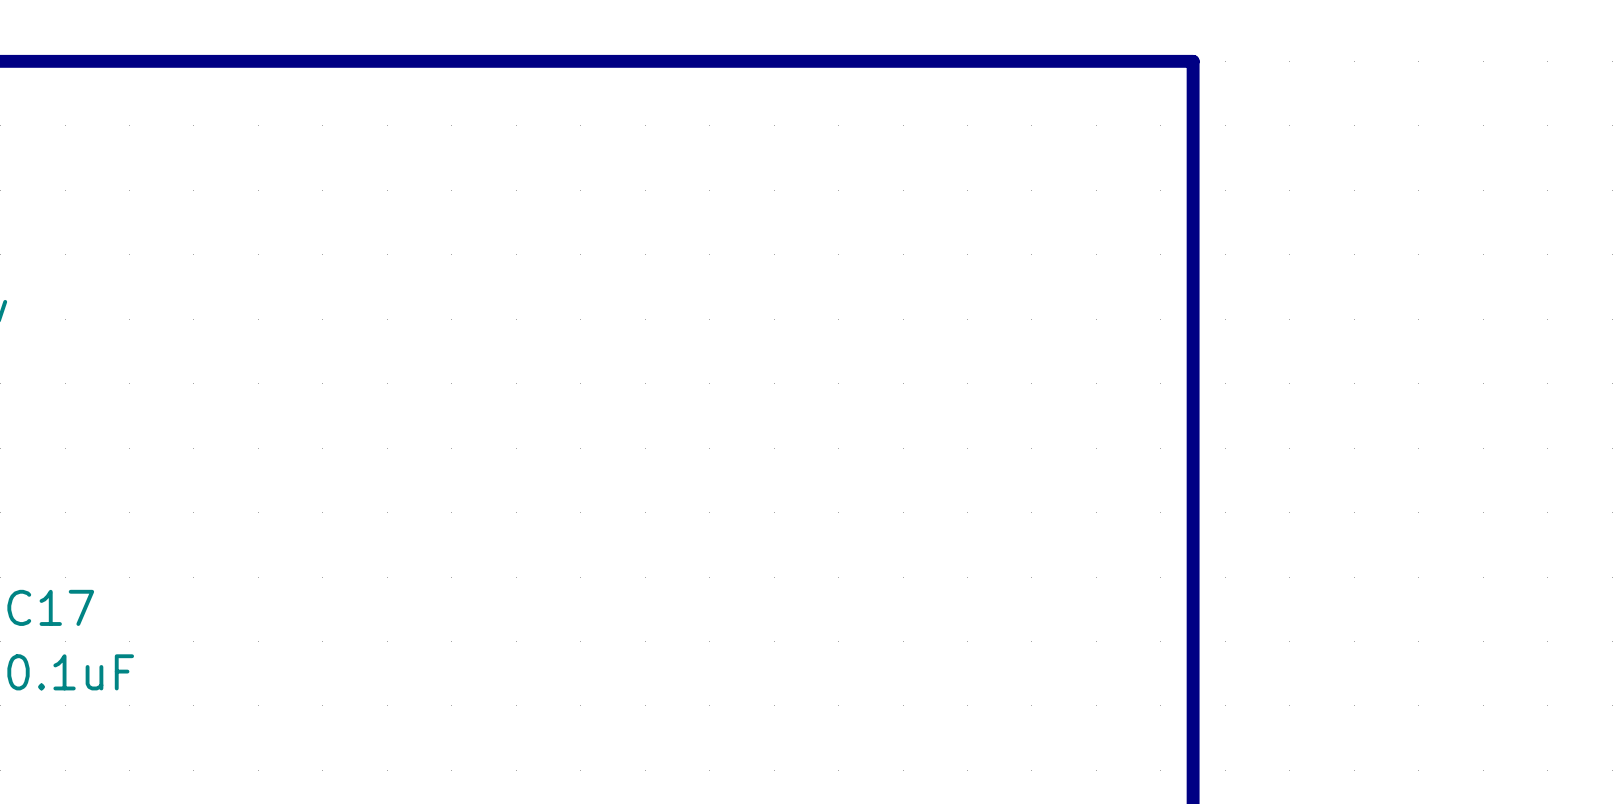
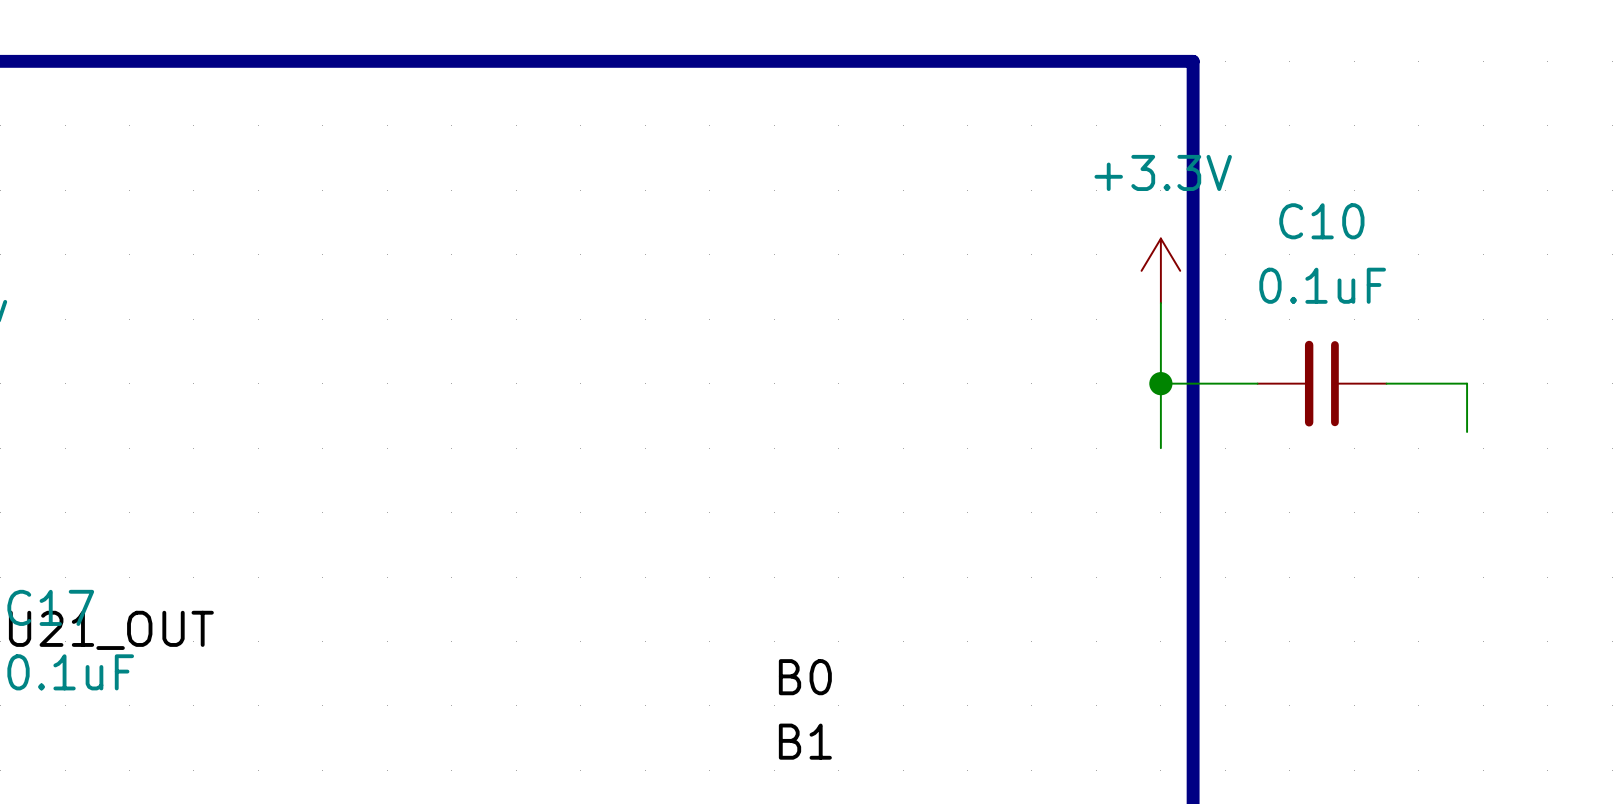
power symbol: none -> +3.3V (1160, 270)
wire: none -> (1160, 303) (1160, 448)
wire: none -> (1160, 383) (1257, 383)
junction: none -> (1160, 383)
C10: none -> 0.1uF (1322, 383)
wire: none -> (1386, 383) (1467, 383) (1467, 431)
label: none -> U21_OUT (111, 630)
label: none -> B0 (805, 677)
label: none -> B1 (805, 741)

